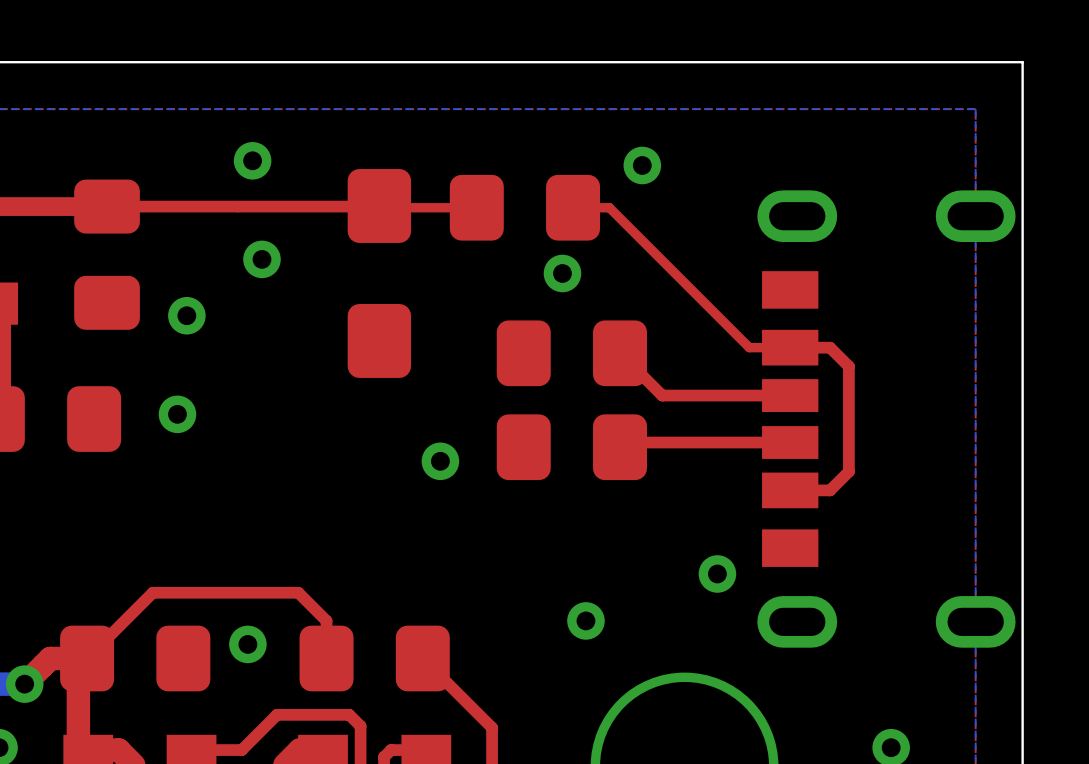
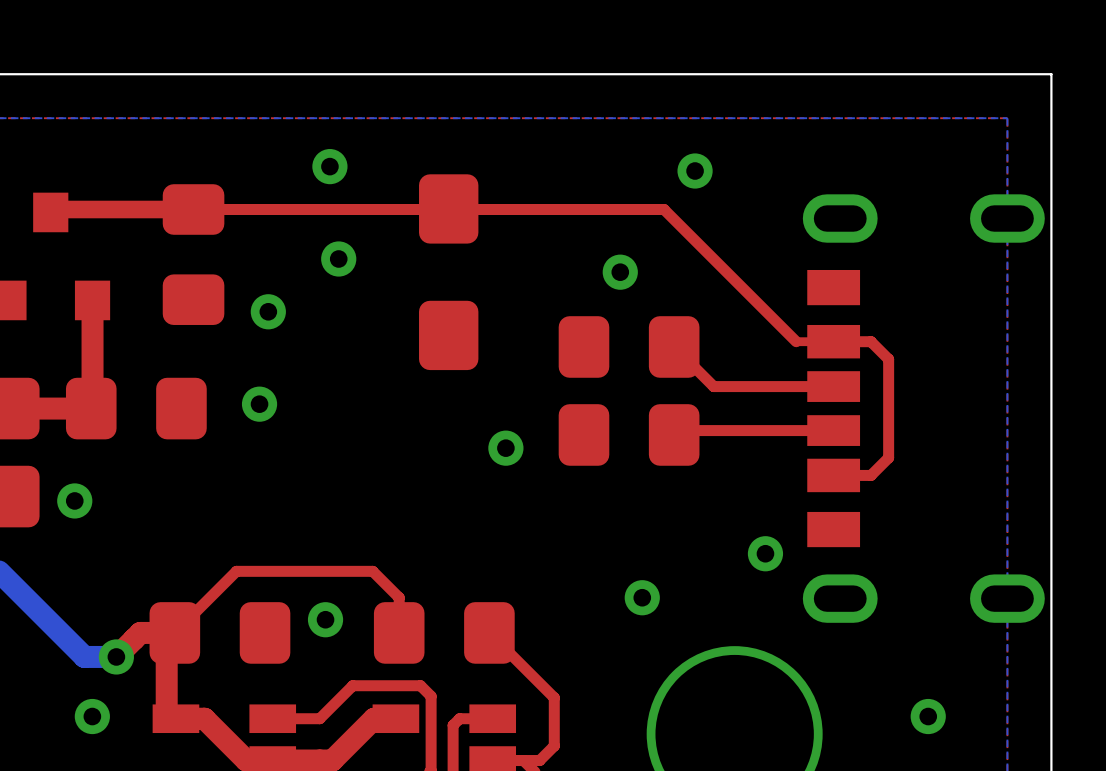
part: (524, 207) -> none
top track: (573, 207) (609, 207) (749, 347) -> (448, 209) (664, 209) (796, 341)

